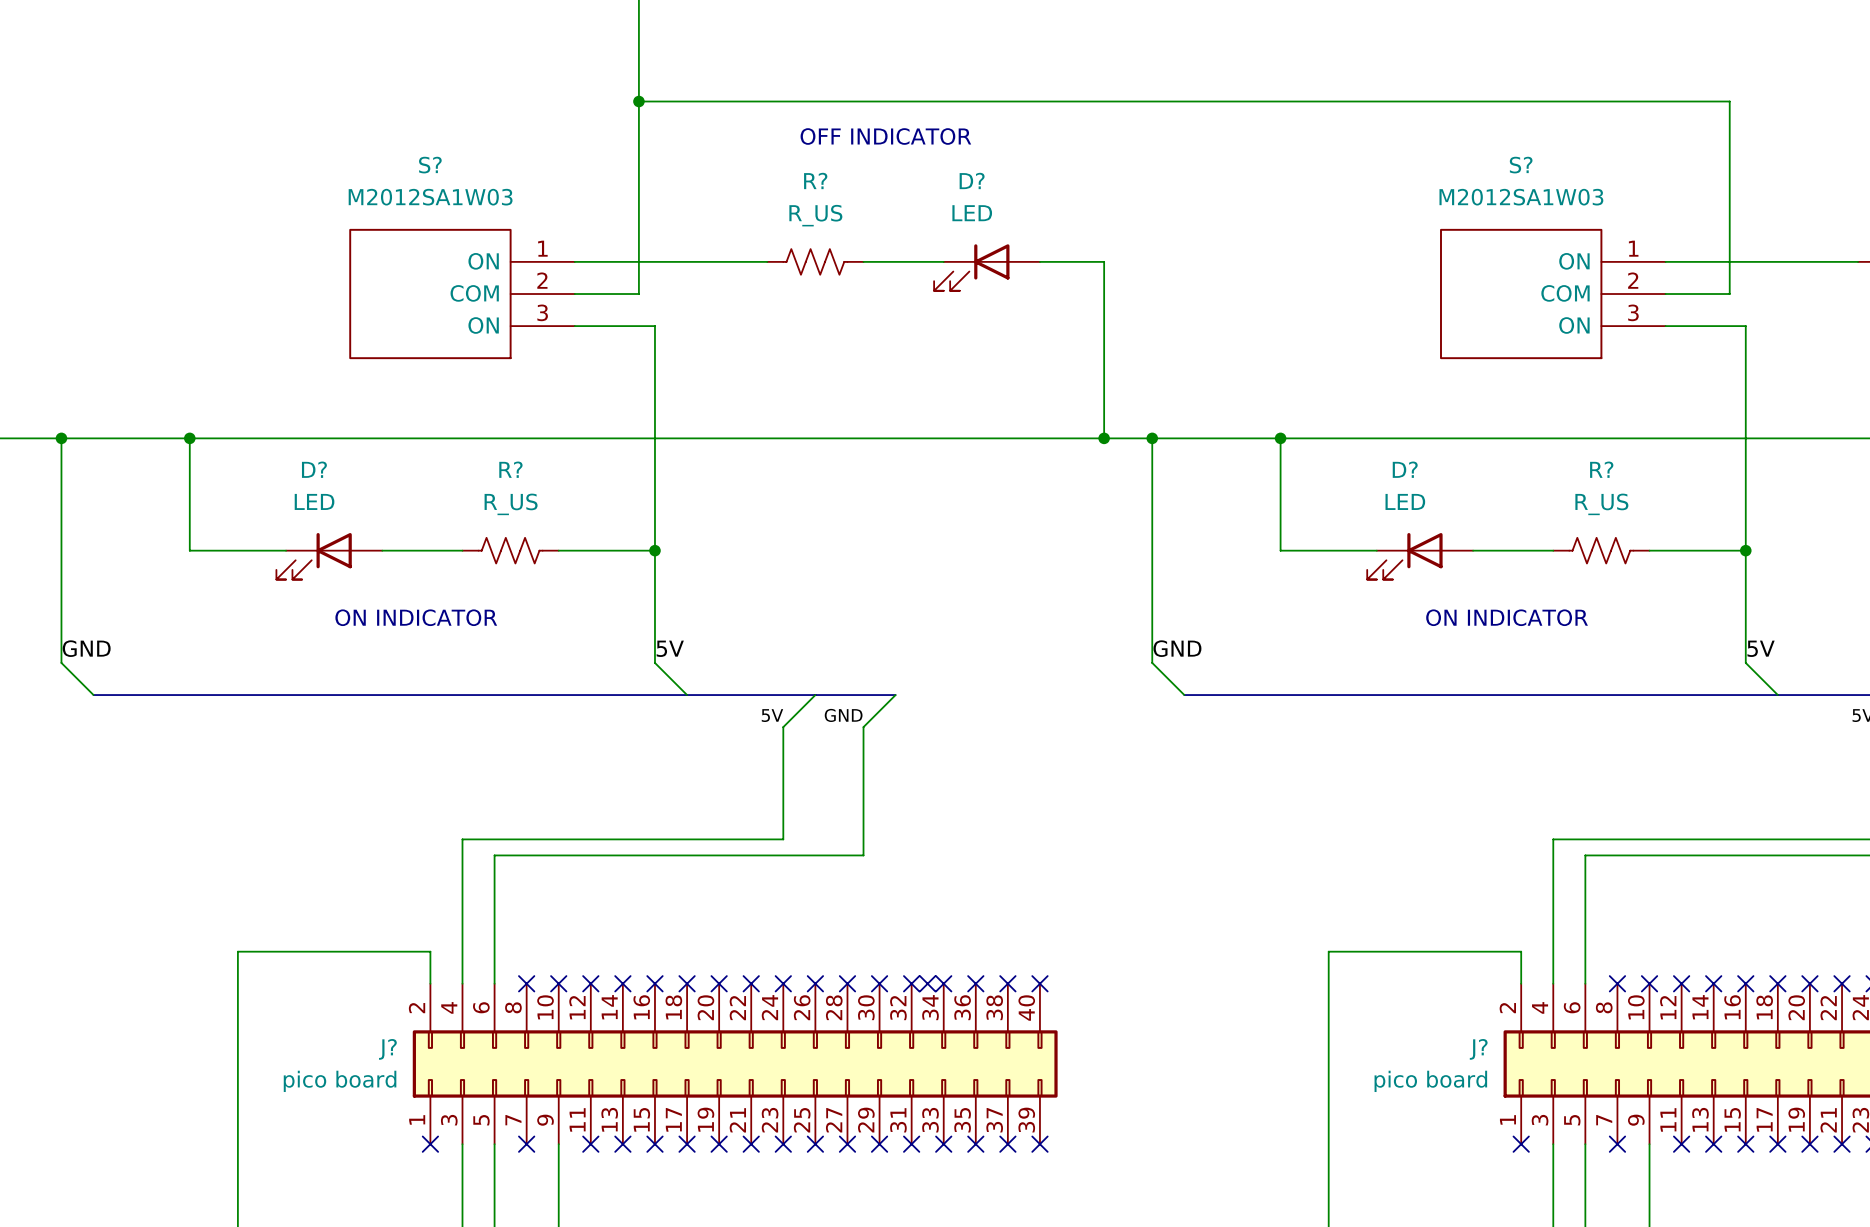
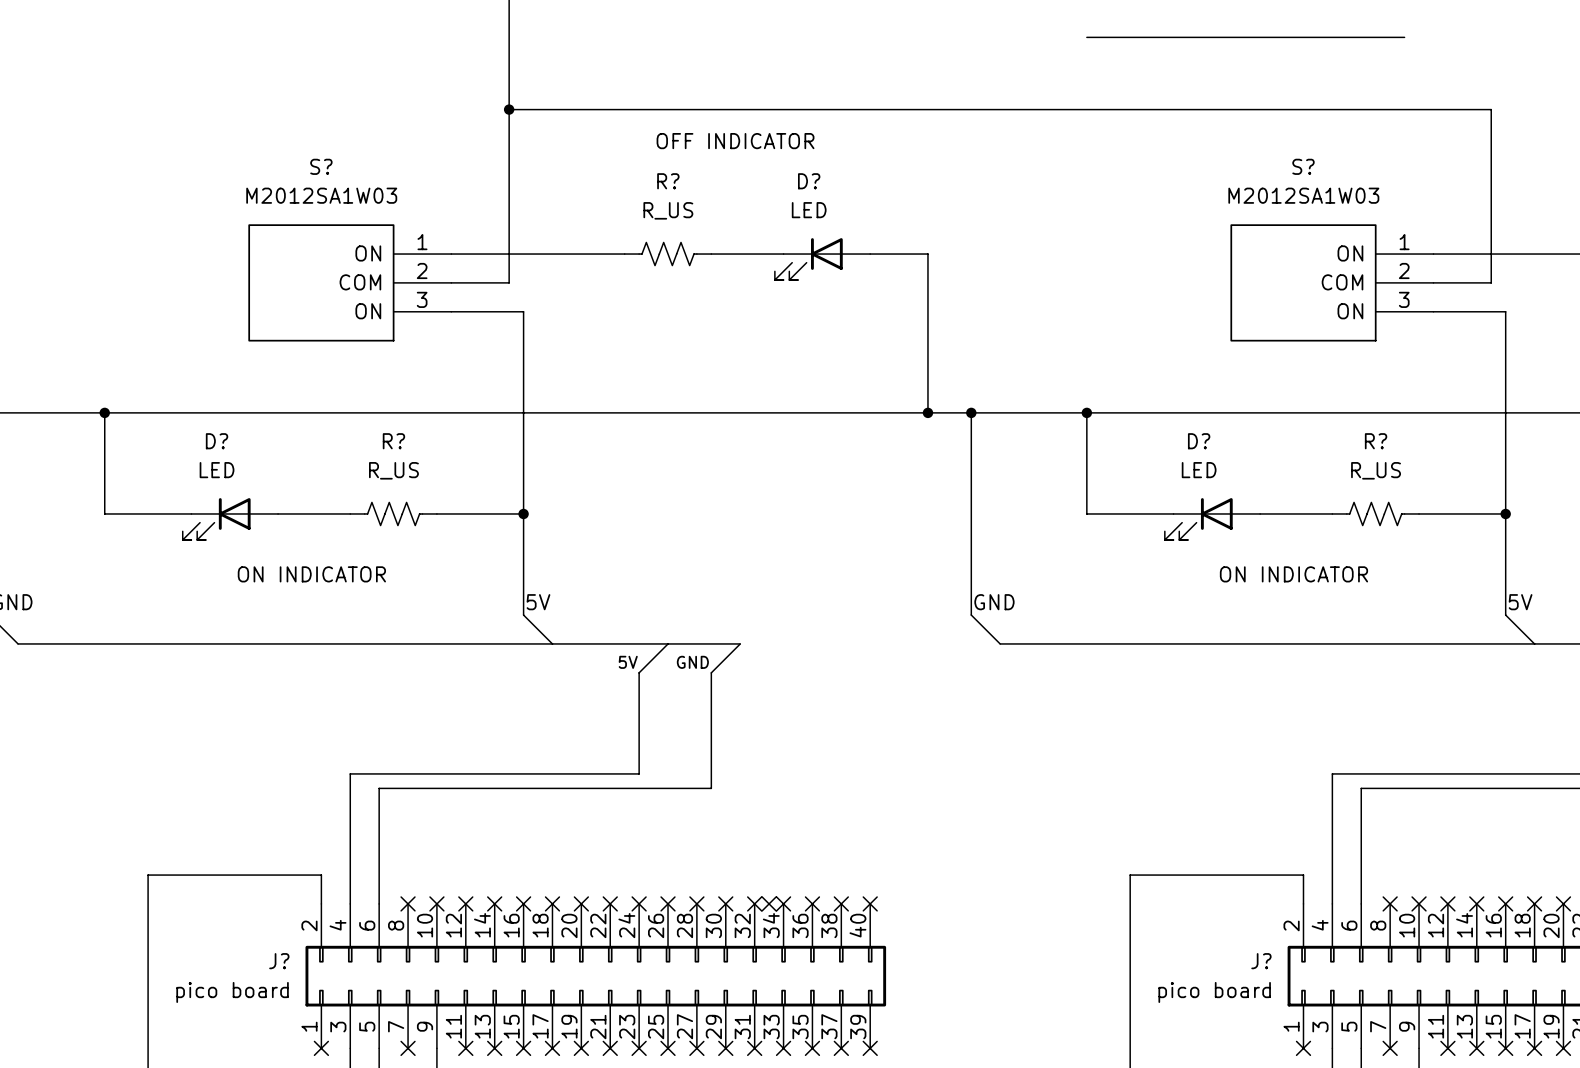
wire: none -> (1086, 37) (1404, 37)

